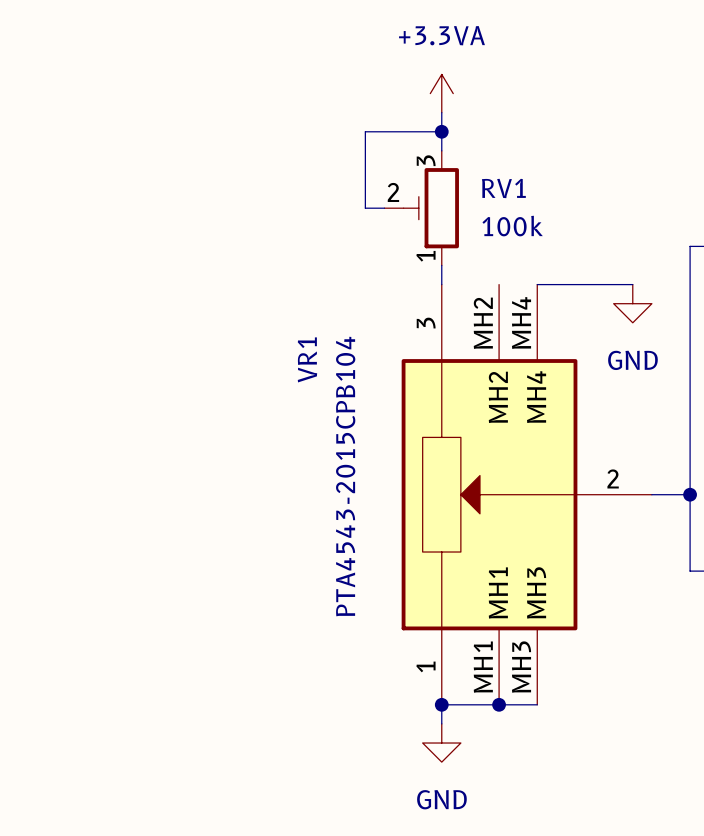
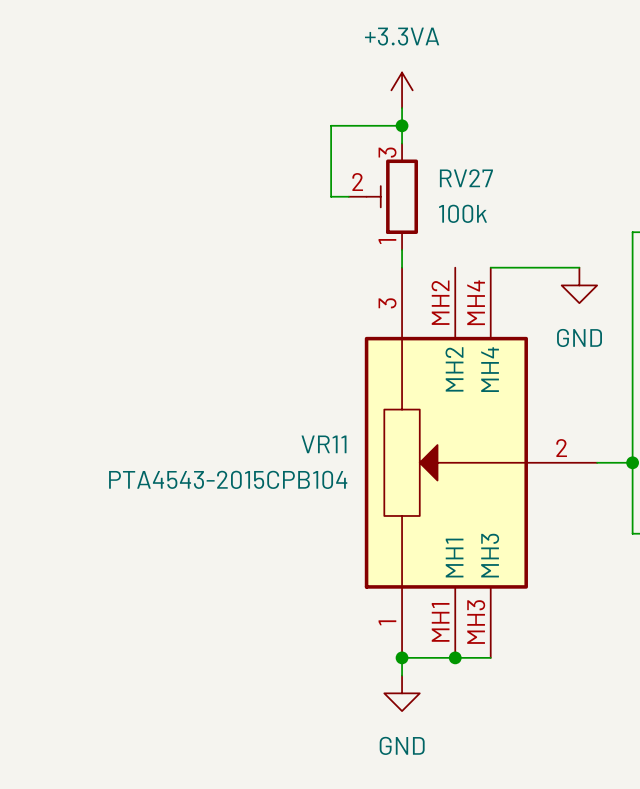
RV1 name: RV1 (503, 188) -> RV27 (466, 178)
VR1 name: VR1 (307, 359) -> VR11 (324, 444)
VR1 value rotation: 0° (345, 476) -> 90° clockwise (228, 479)

